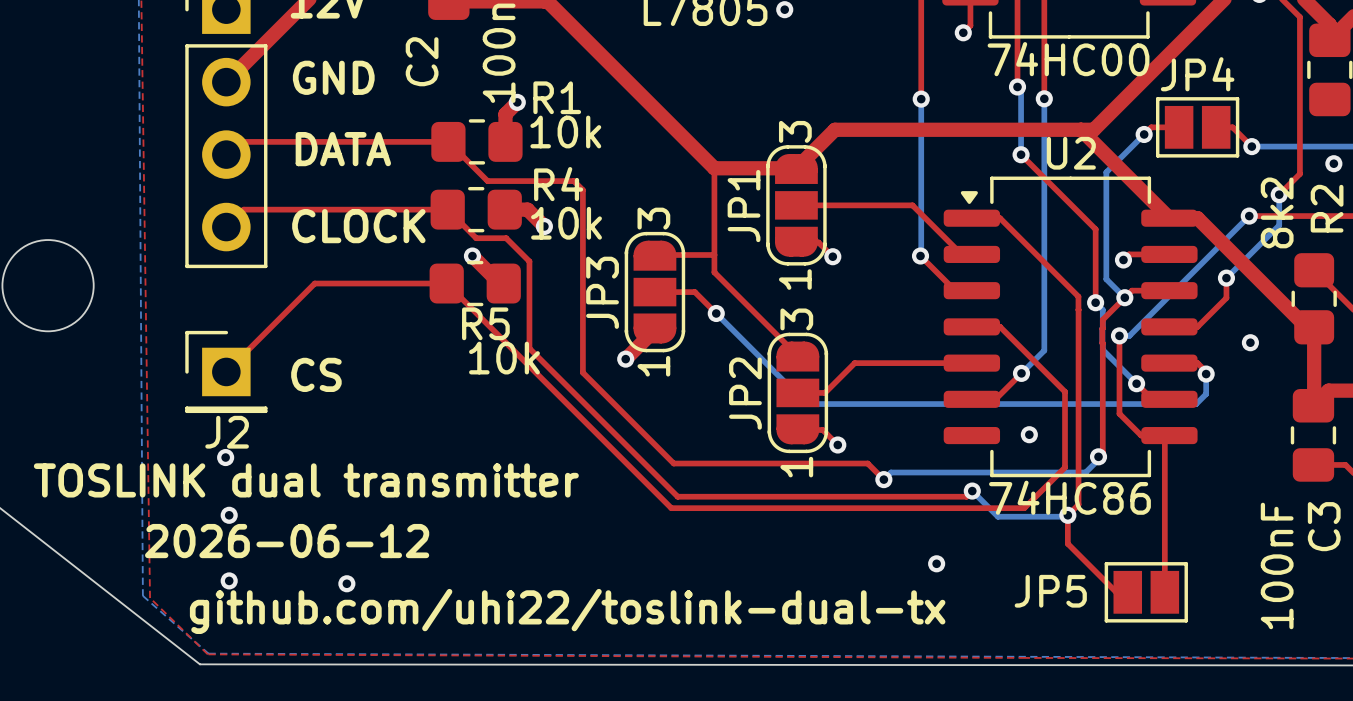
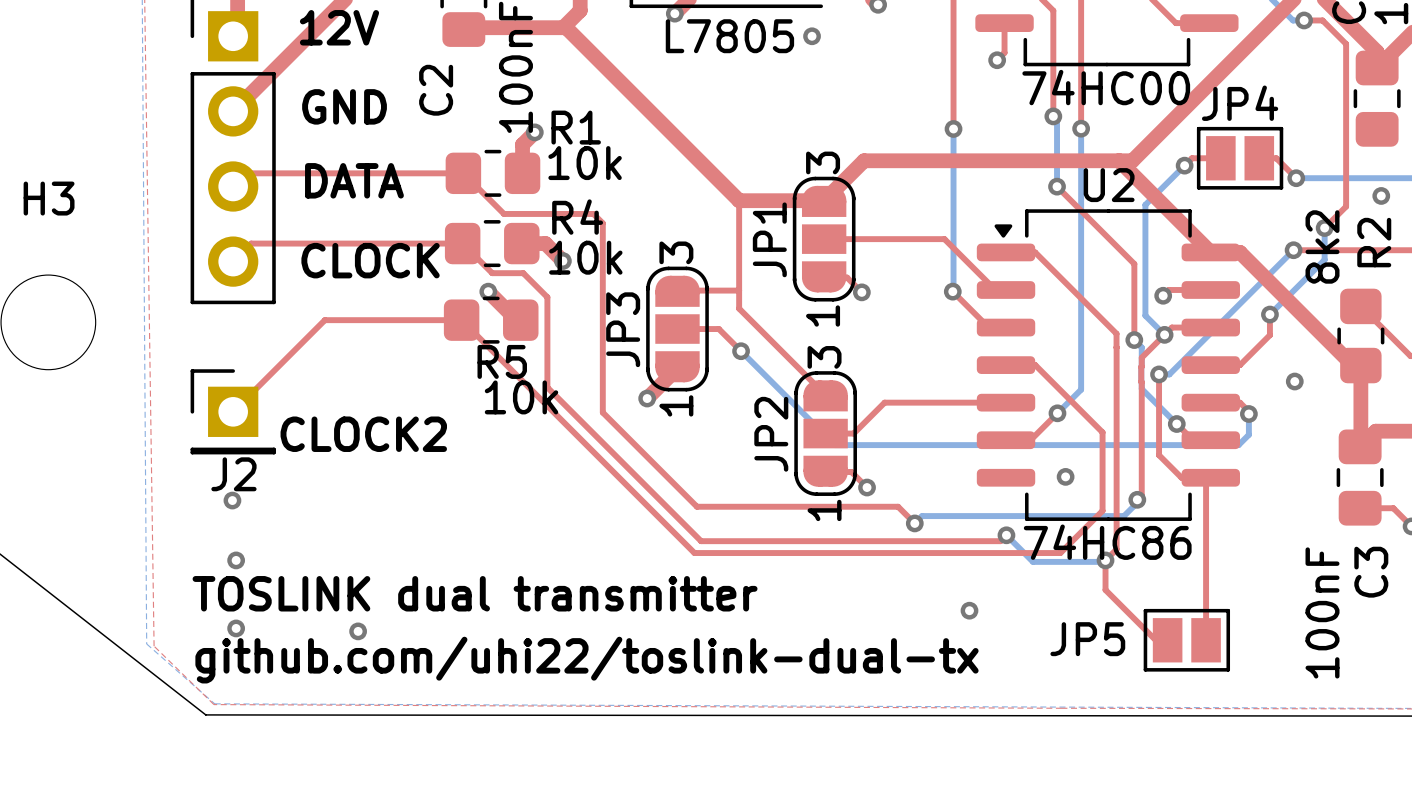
H3 name: none -> H3 (49, 198)
text: CS (316, 374) -> CLOCK2 (363, 434)
text position: TOSLINK dual transmitter (306, 480) -> TOSLINK dual transmitter (475, 593)
text: 2026-06-12 (287, 541) -> none

